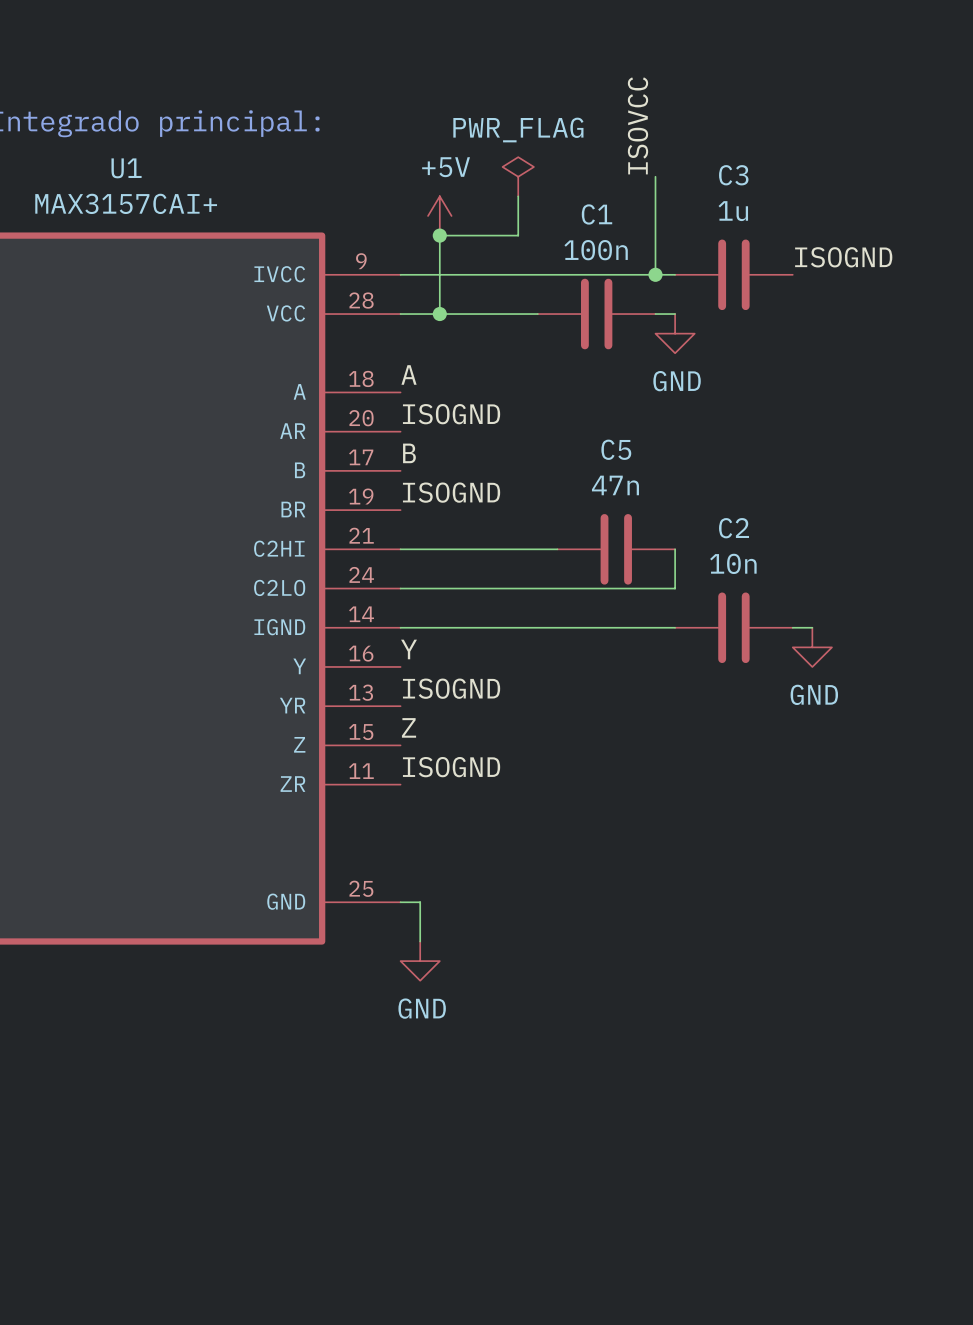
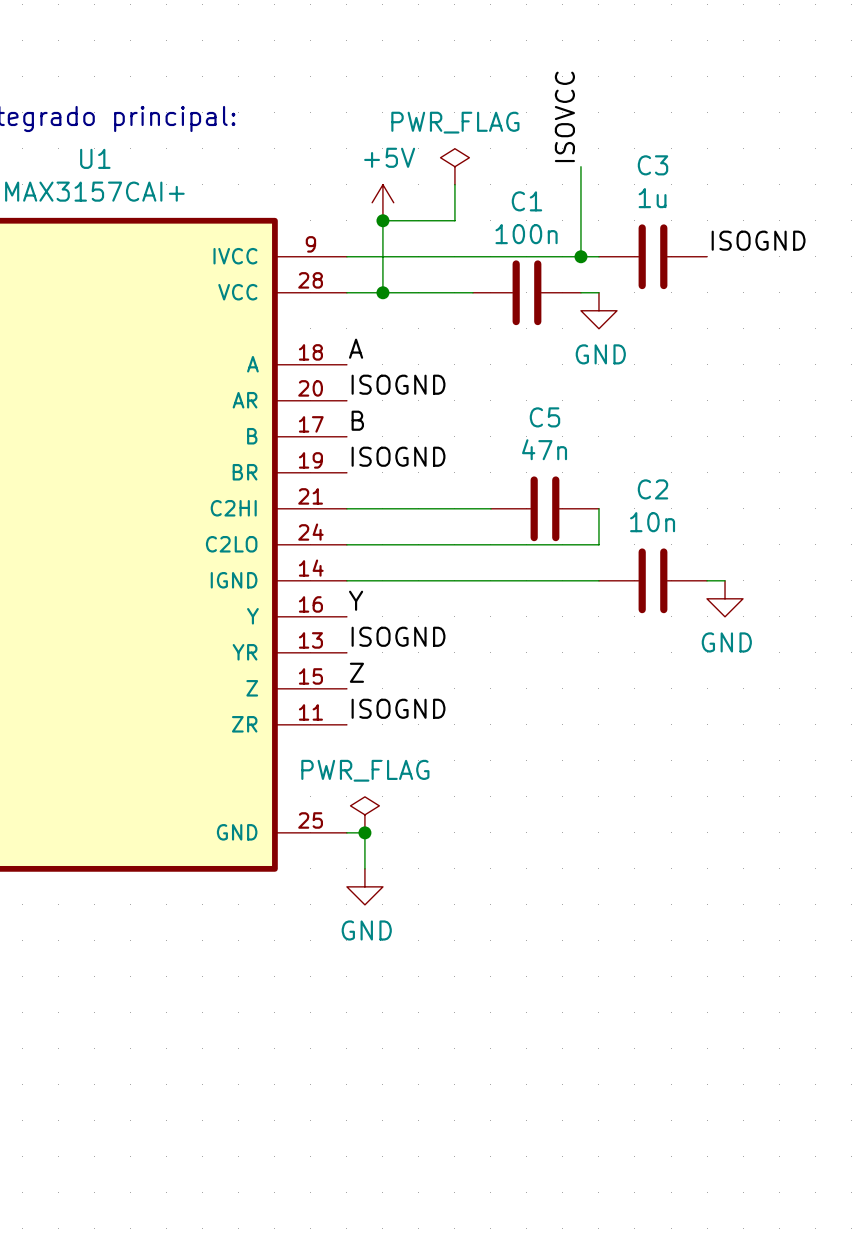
power symbol: none -> PWR_FLAG (364, 814)
junction: none -> (364, 832)

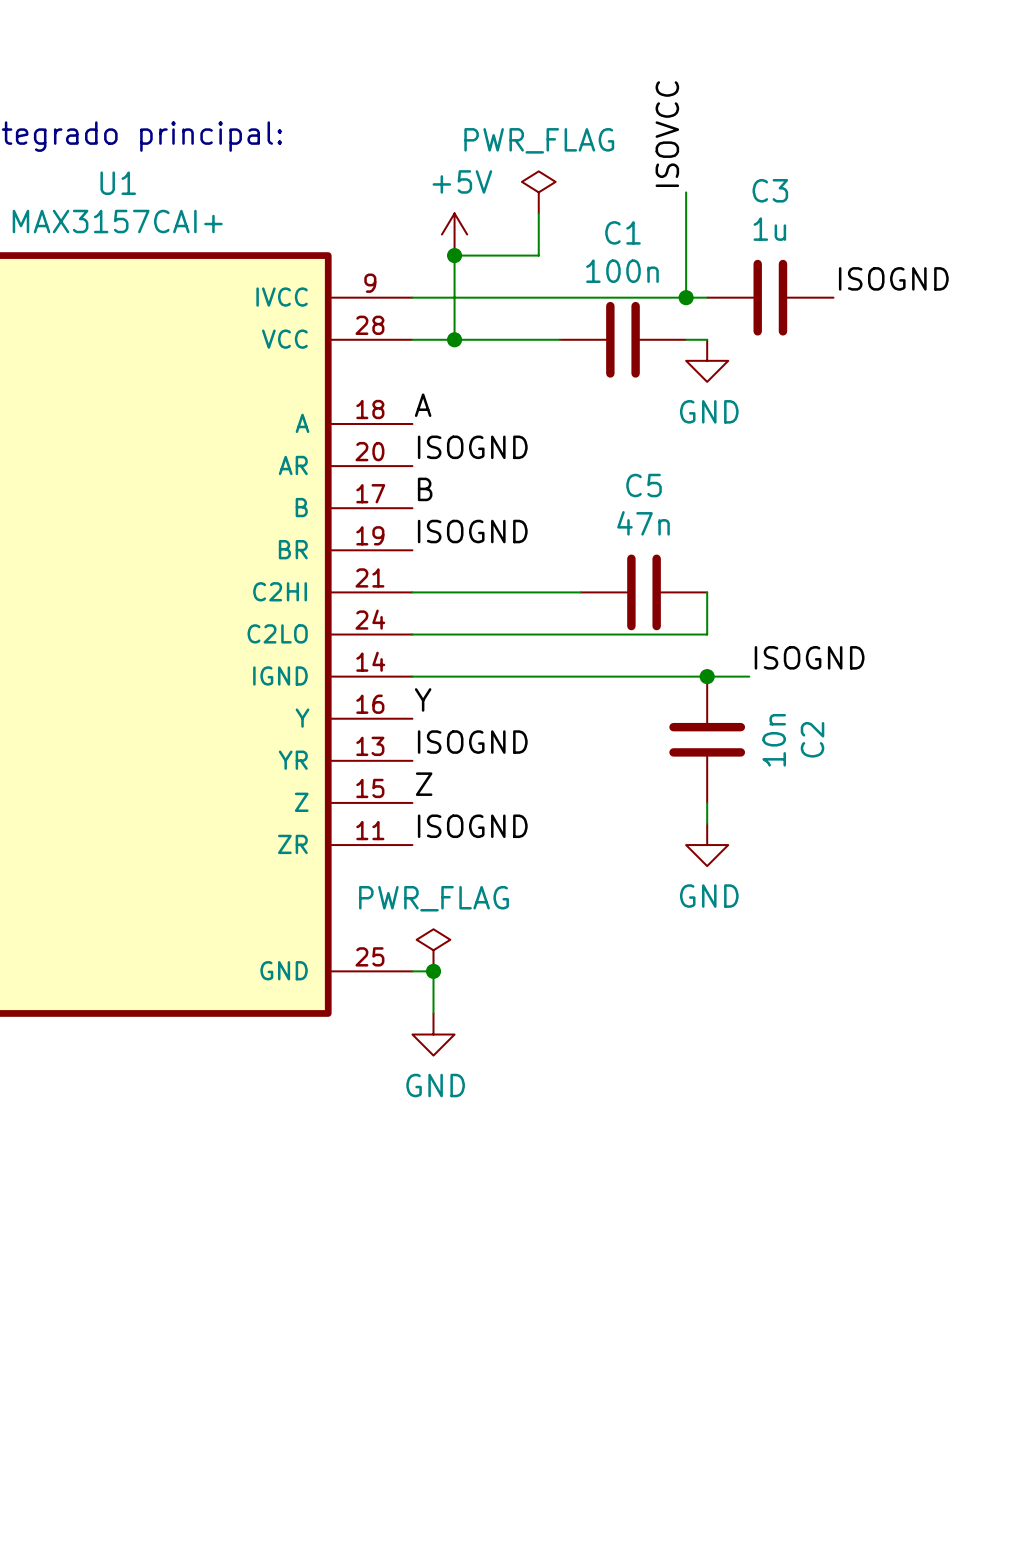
label: none -> ISOGND (809, 657)
junction: none -> (707, 676)
C2 rotation: 0° (652, 580) -> 90° clockwise (707, 739)
C2 position: (652, 580) -> (707, 739)
wire: (707, 580) (725, 580) -> none
power symbol position: GND (725, 598) -> GND (707, 845)
wire: none -> (707, 802) (707, 823)

